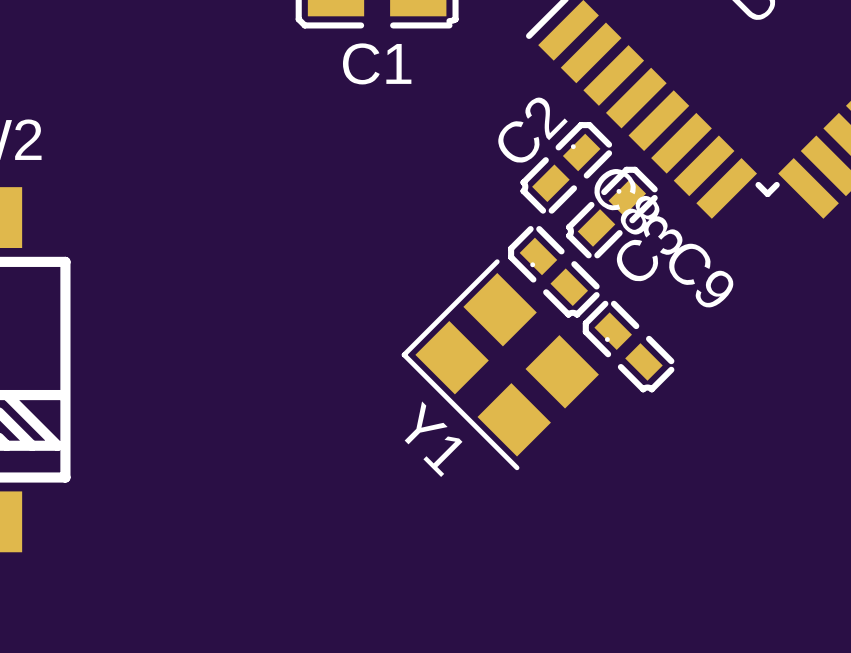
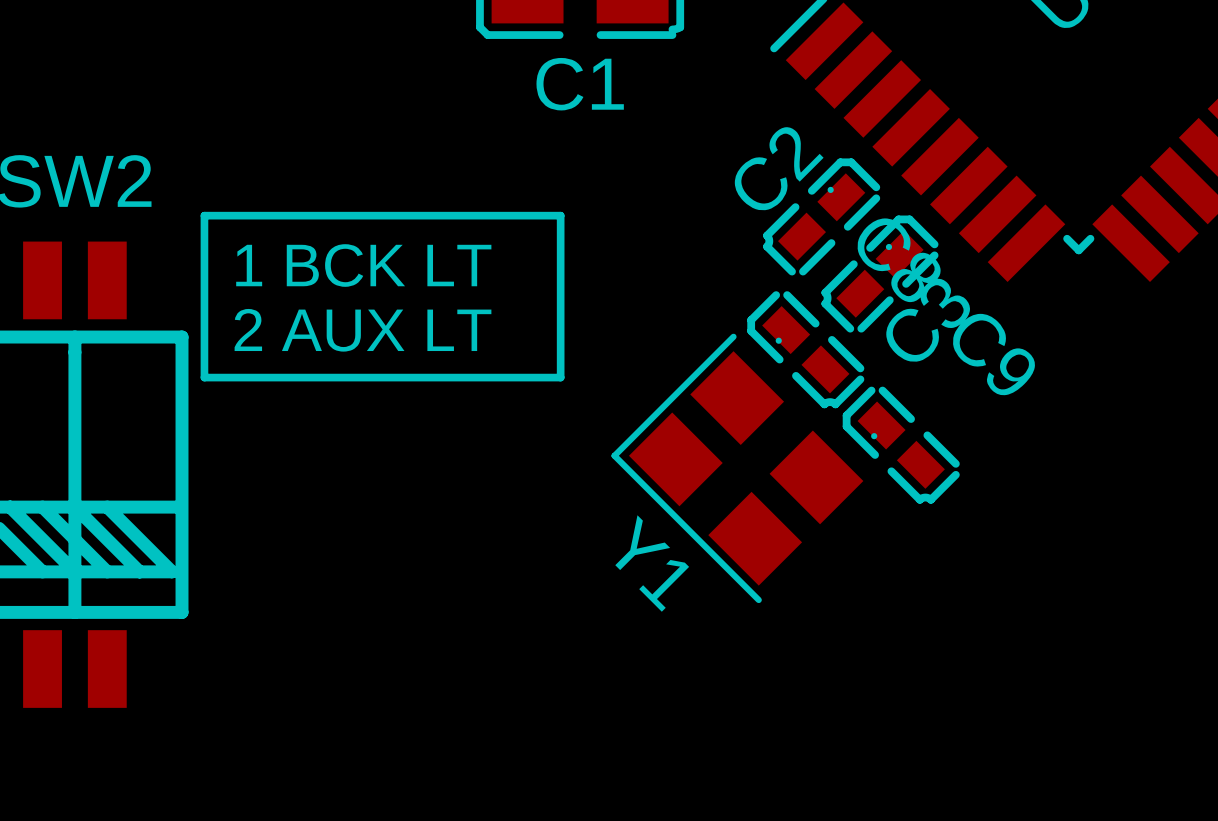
line: none -> (204, 215) (560, 215) (560, 377) (204, 377) (204, 215)
text: none -> 1 BCK LT (363, 265)
text: none -> 2 AUX LT (363, 330)

